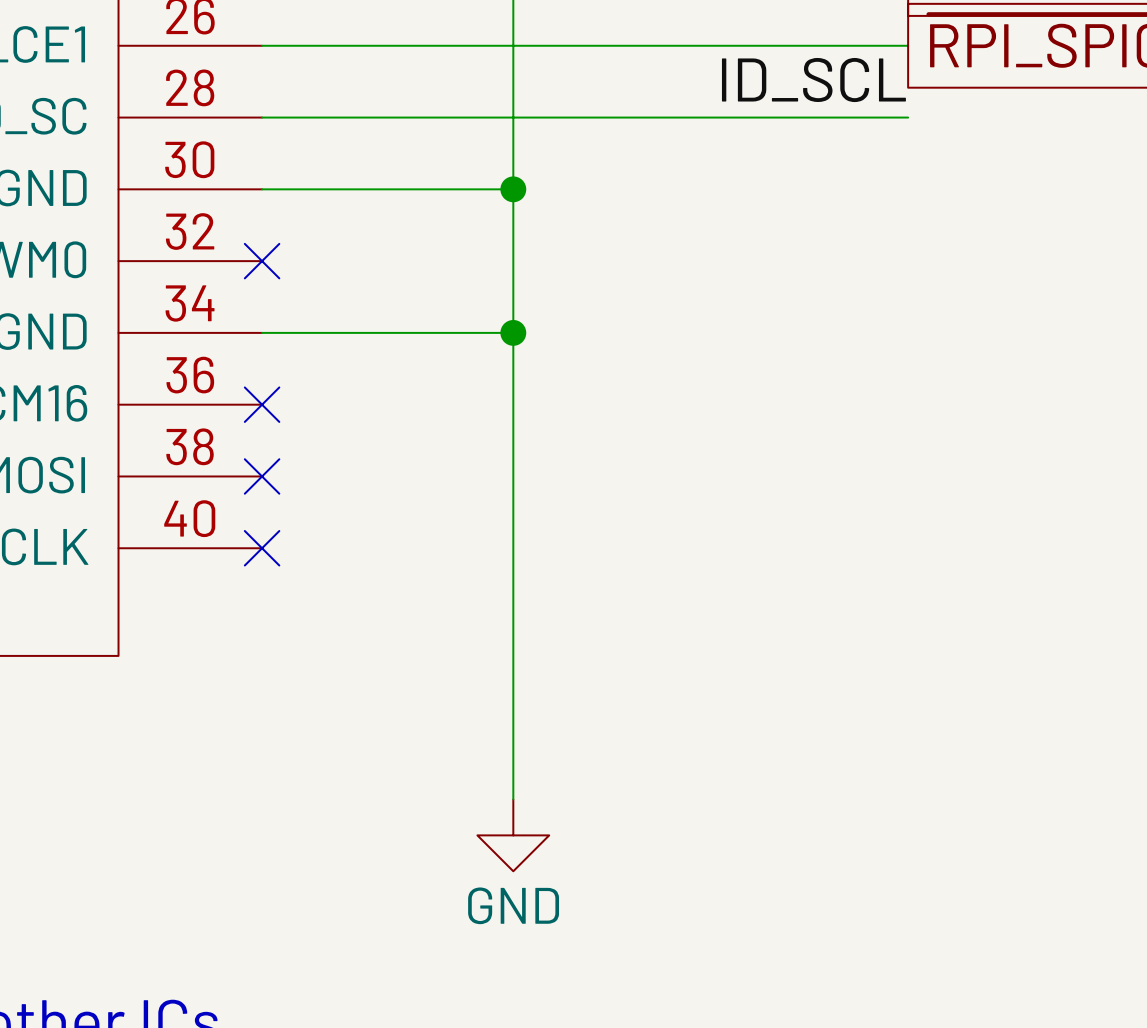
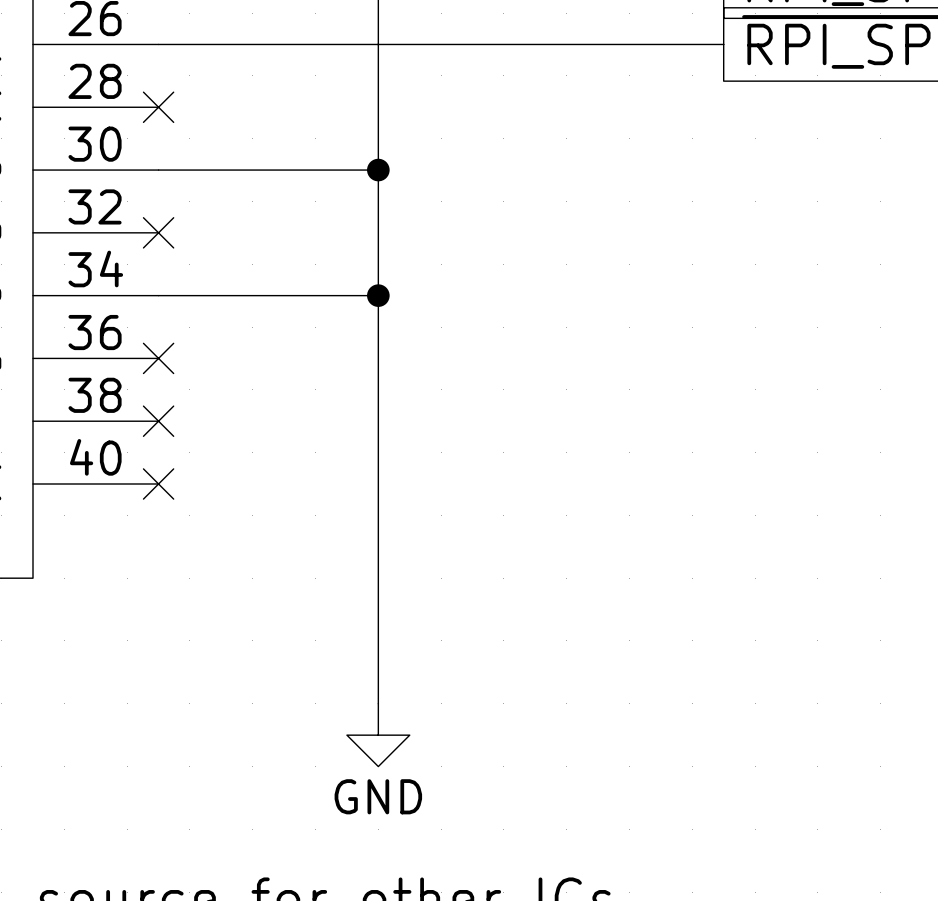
label: ID_SCL (813, 80) -> none
wire: (262, 117) (908, 117) -> none
no-connect mark: none -> (158, 107)

